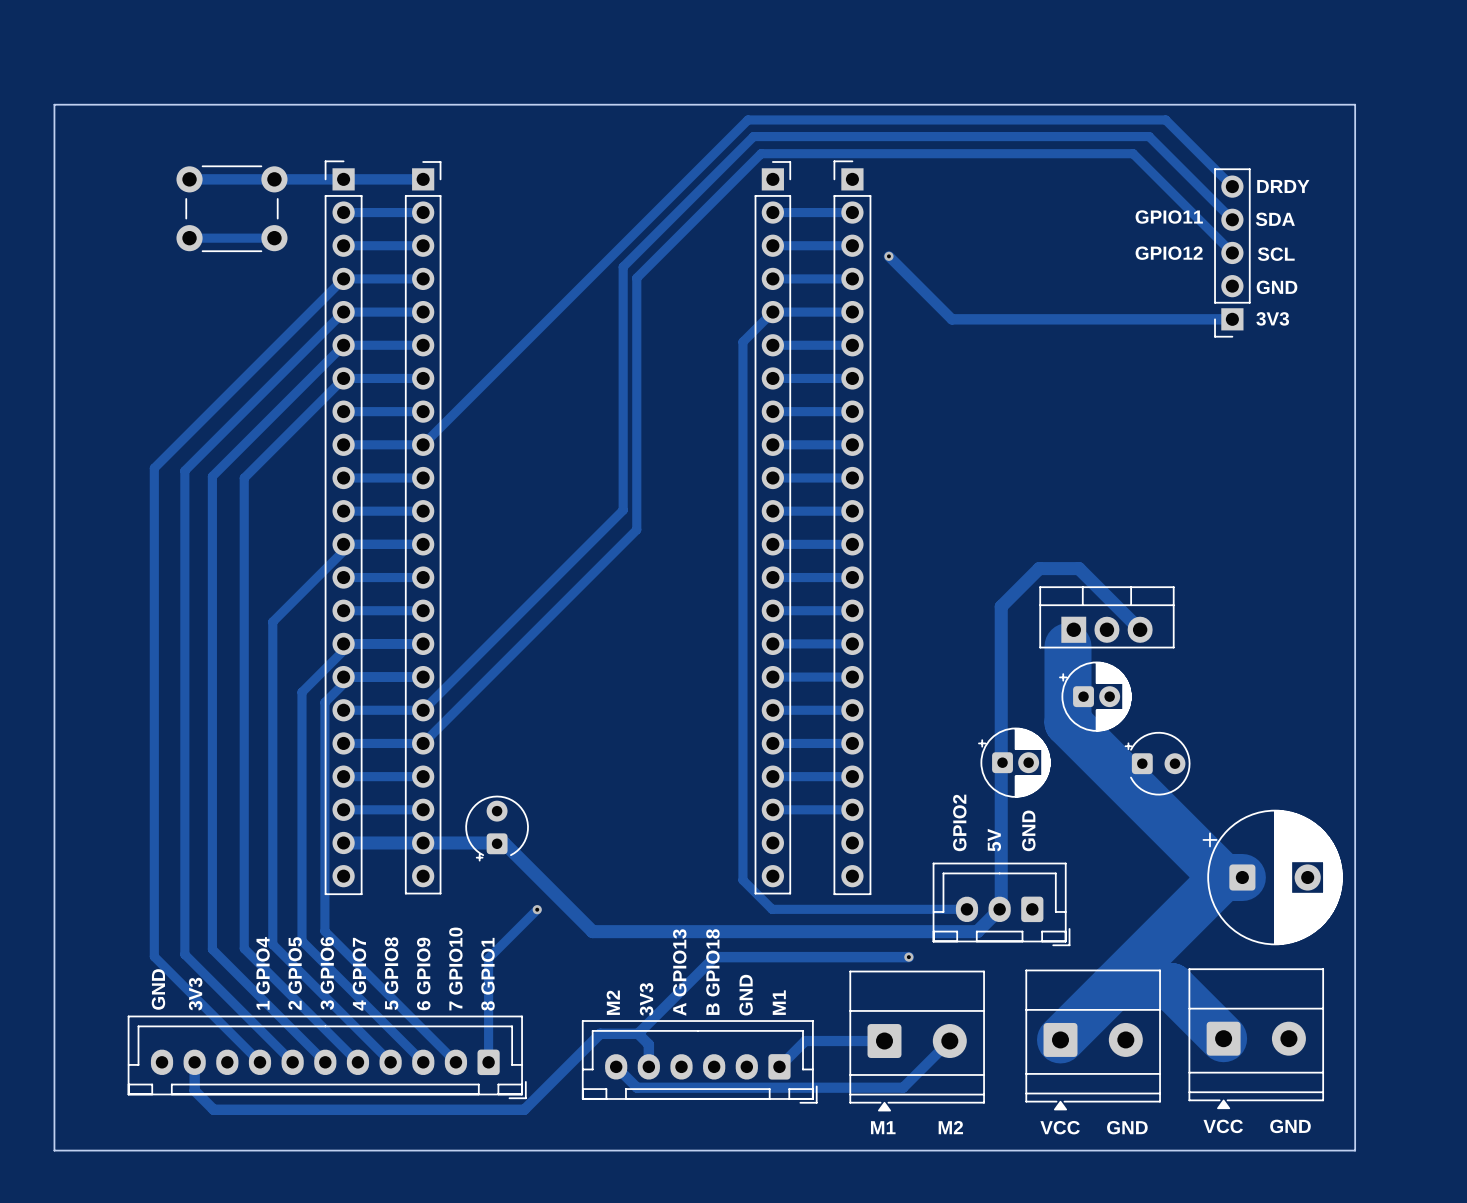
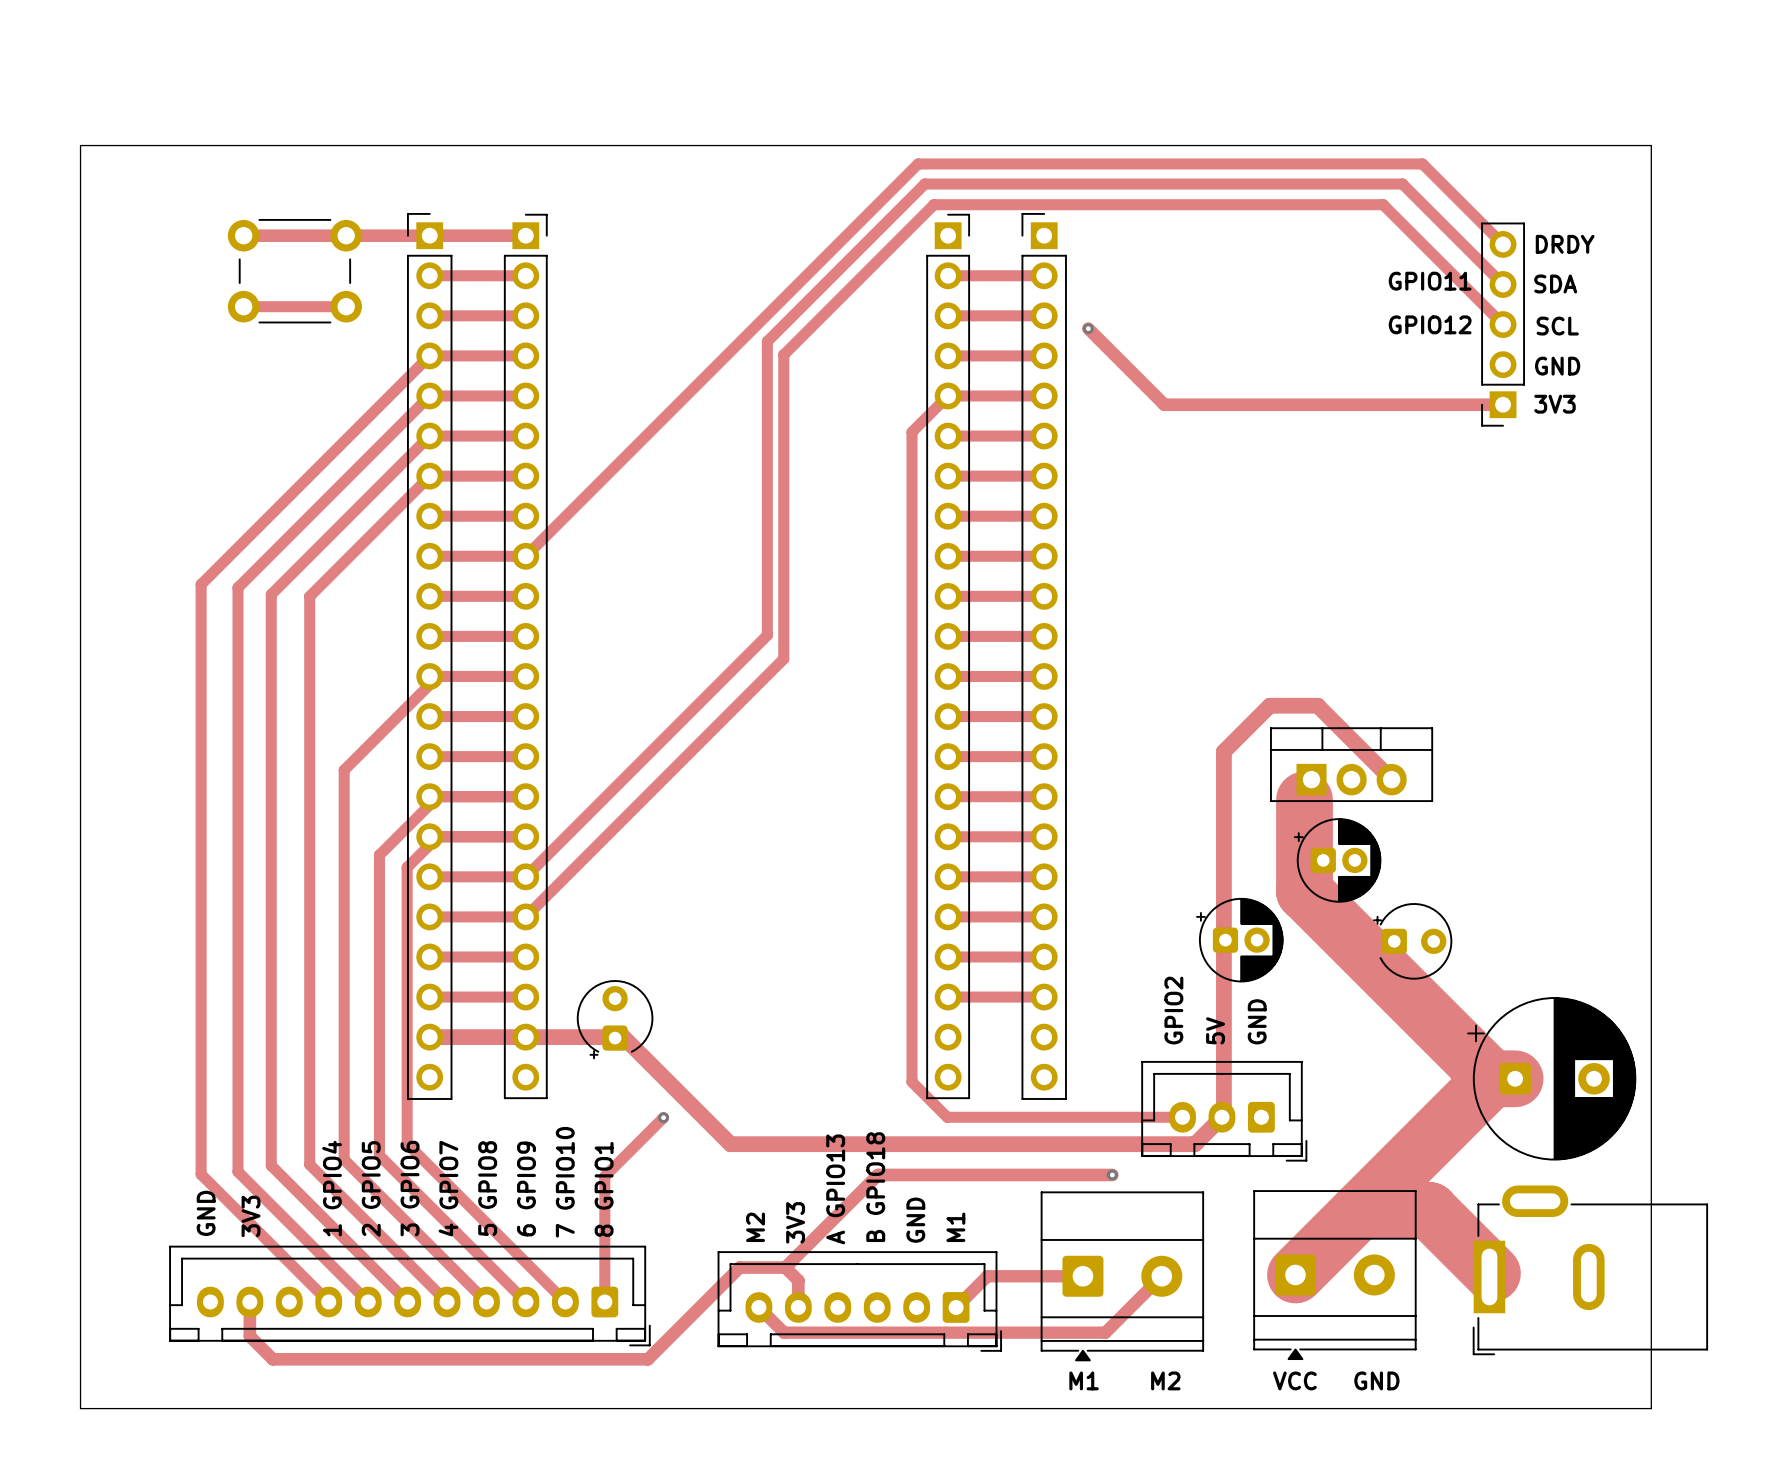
part: none -> (1590, 1270)
part: (1256, 1038) -> none
text: VCC (1223, 1126) -> none
text: GND (1290, 1126) -> none

